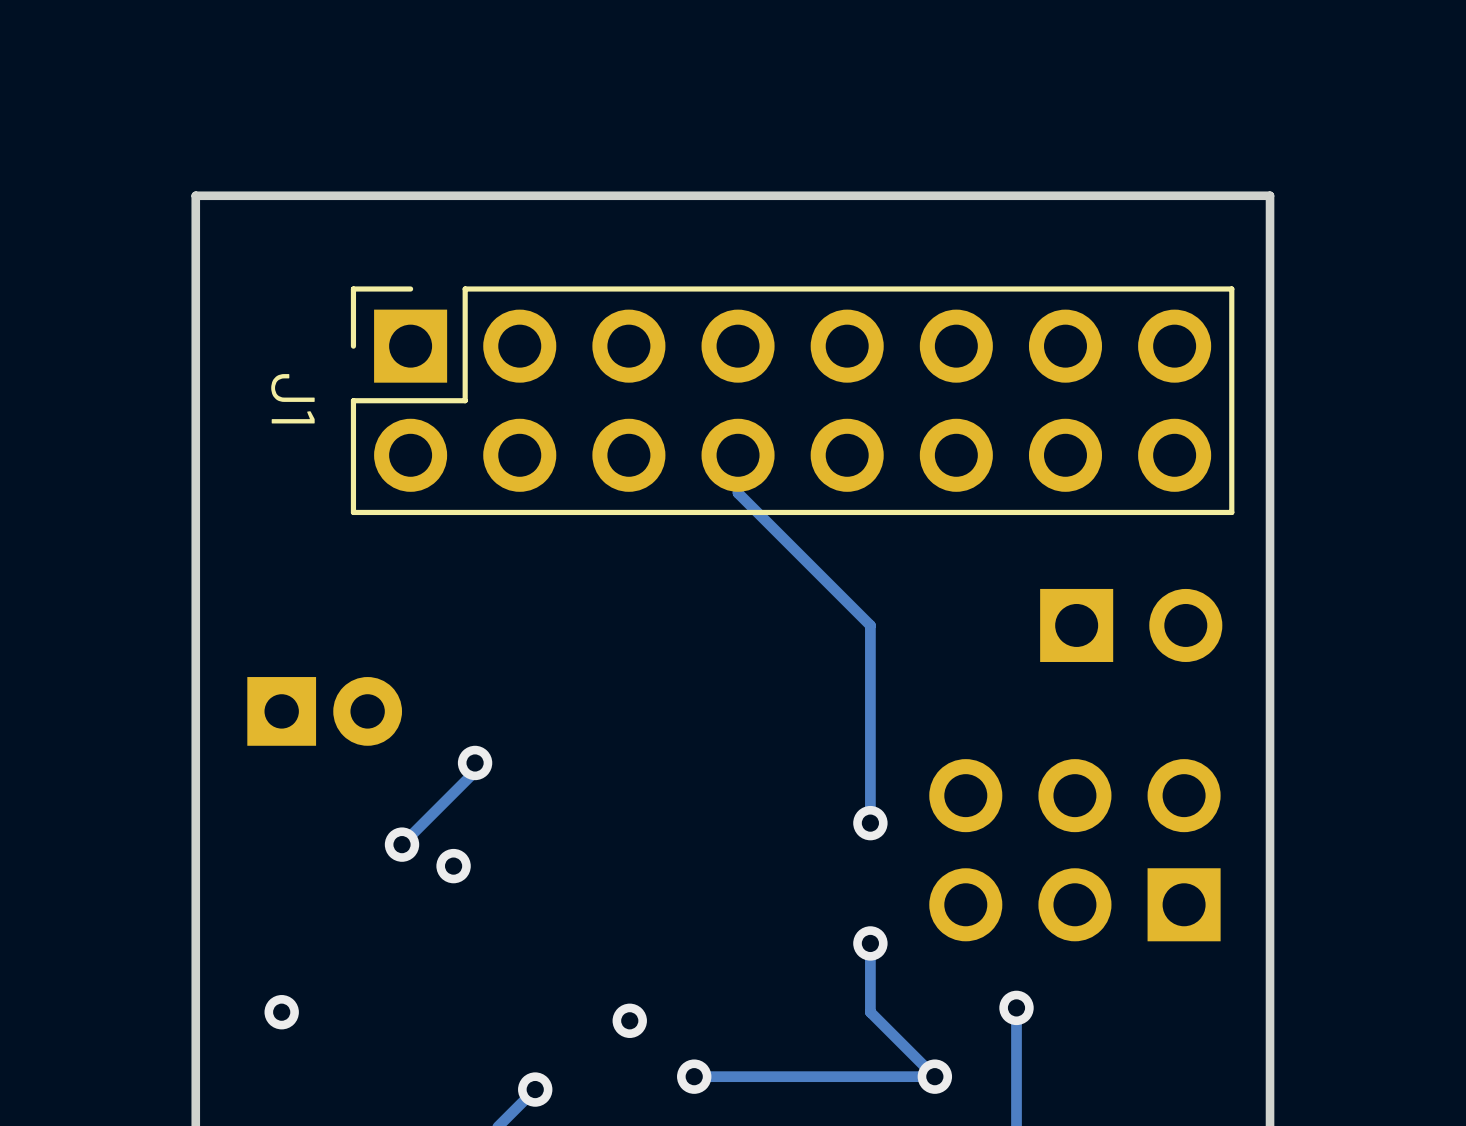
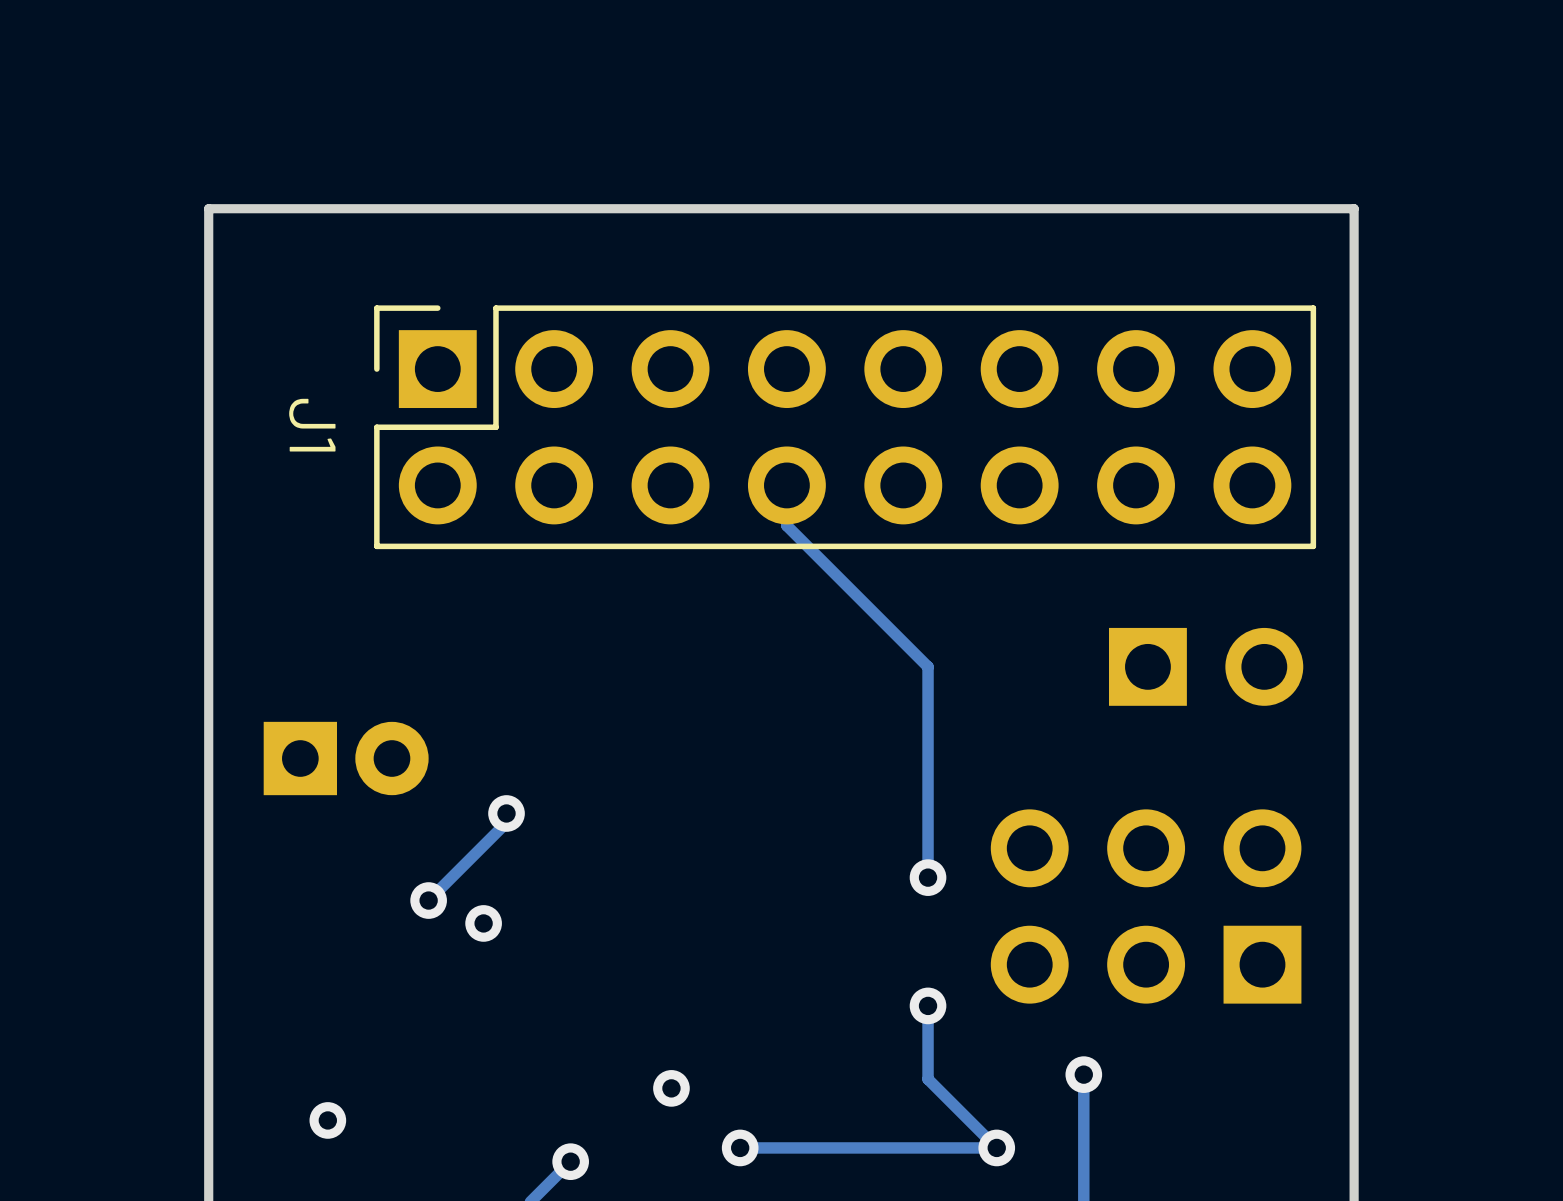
via position: (281, 1012) -> (327, 1120)

